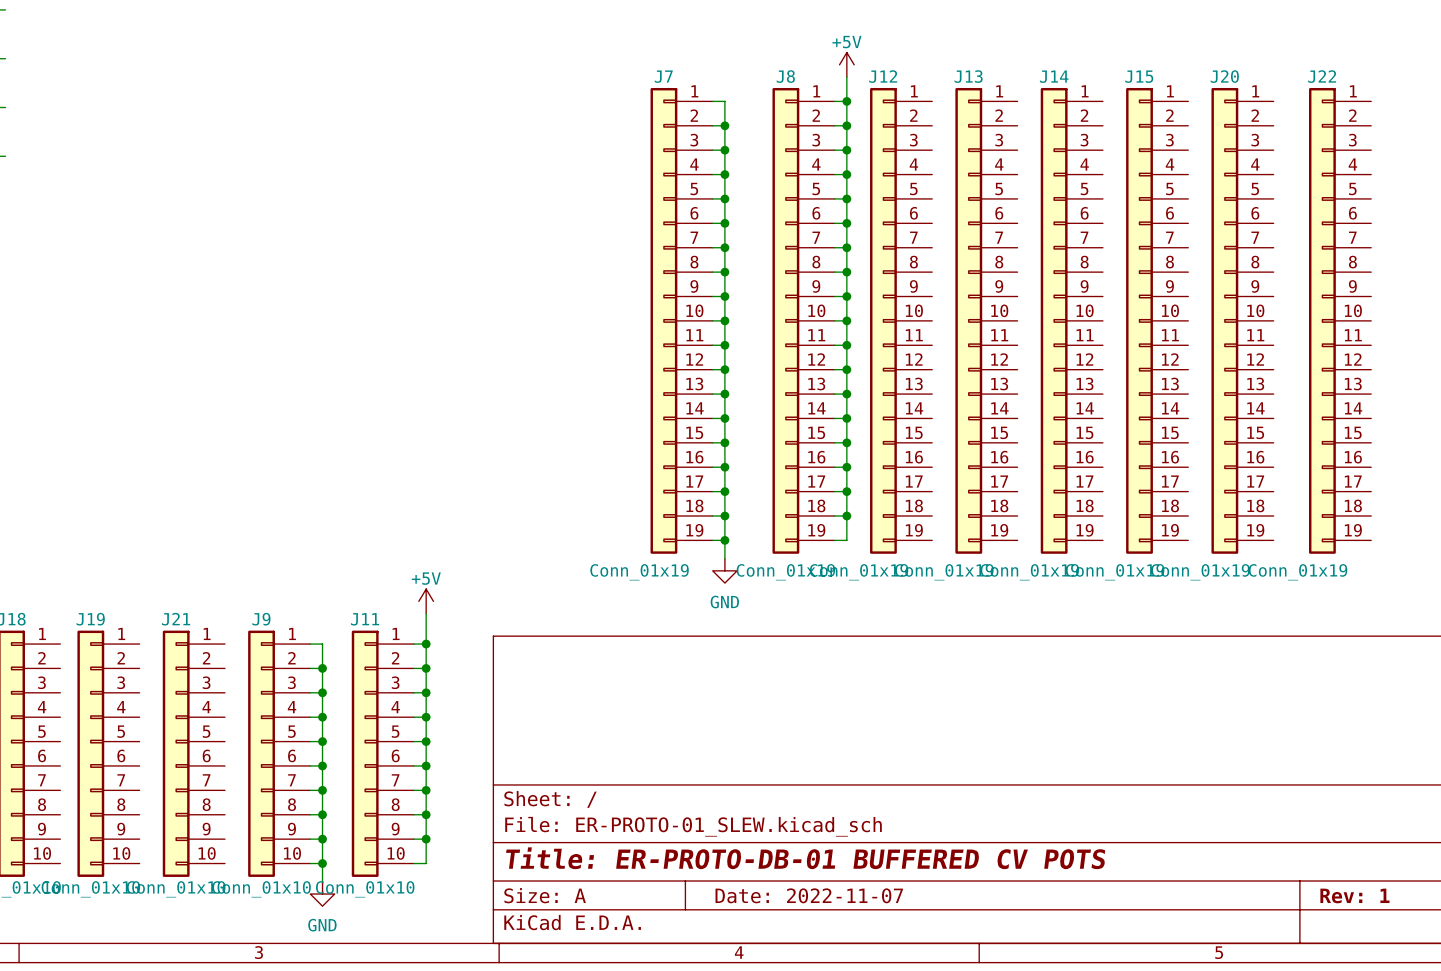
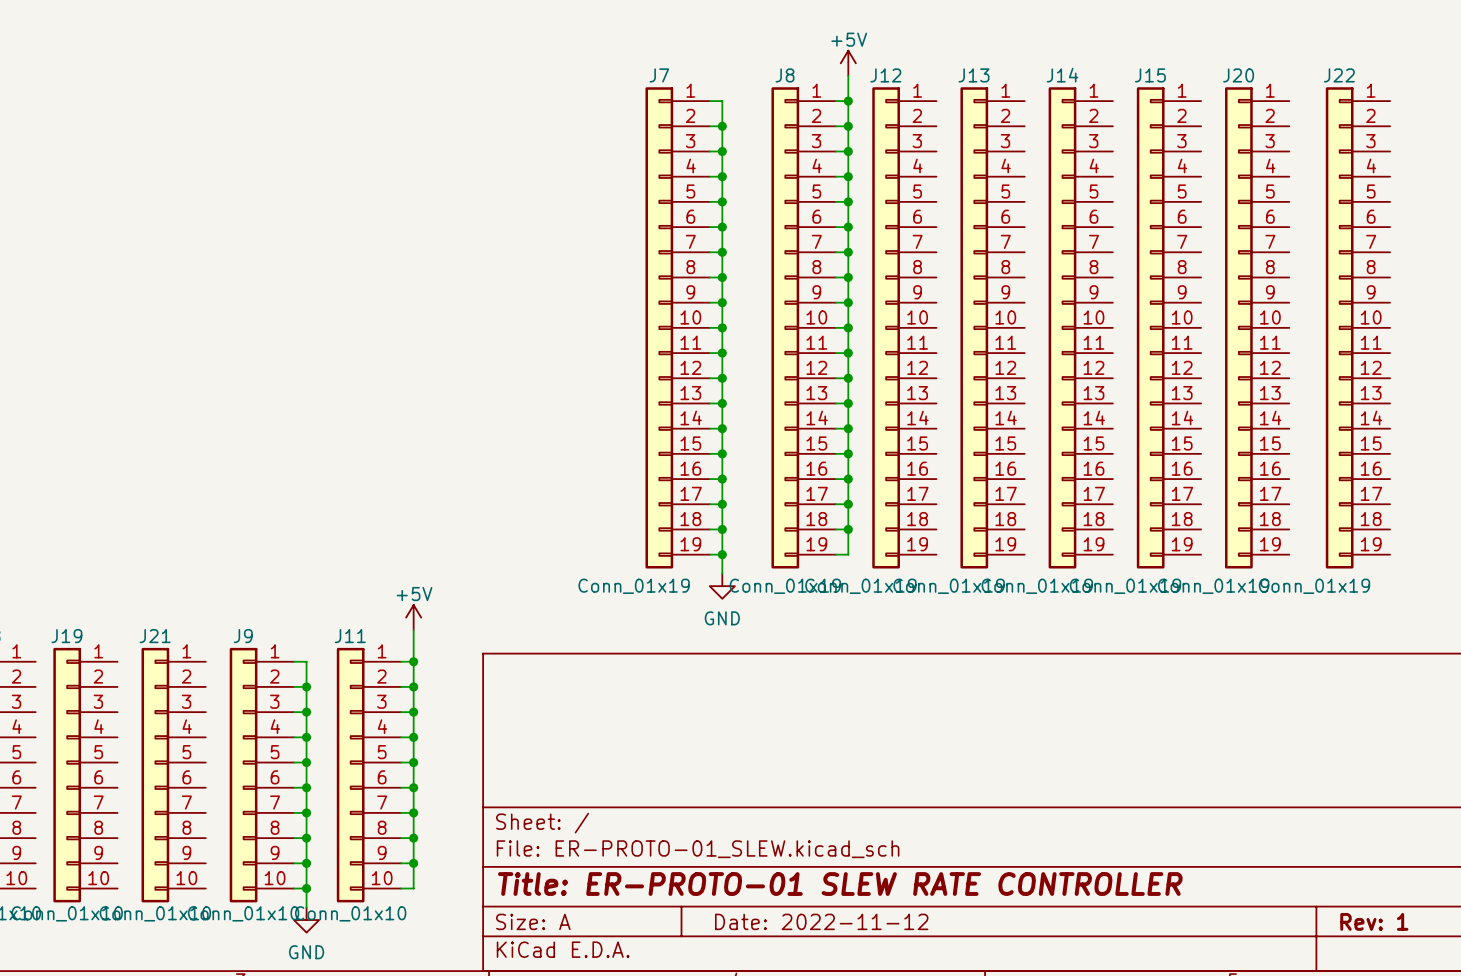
title block: Title: ER-PROTO-DB-01 BUFFERED CV POTS (805, 858) -> Title: ER-PROTO-01 SLEW RATE CONTROLLER (840, 884)
title block: Date: 2022-11-07 (809, 895) -> Date: 2022-11-12 (821, 921)

